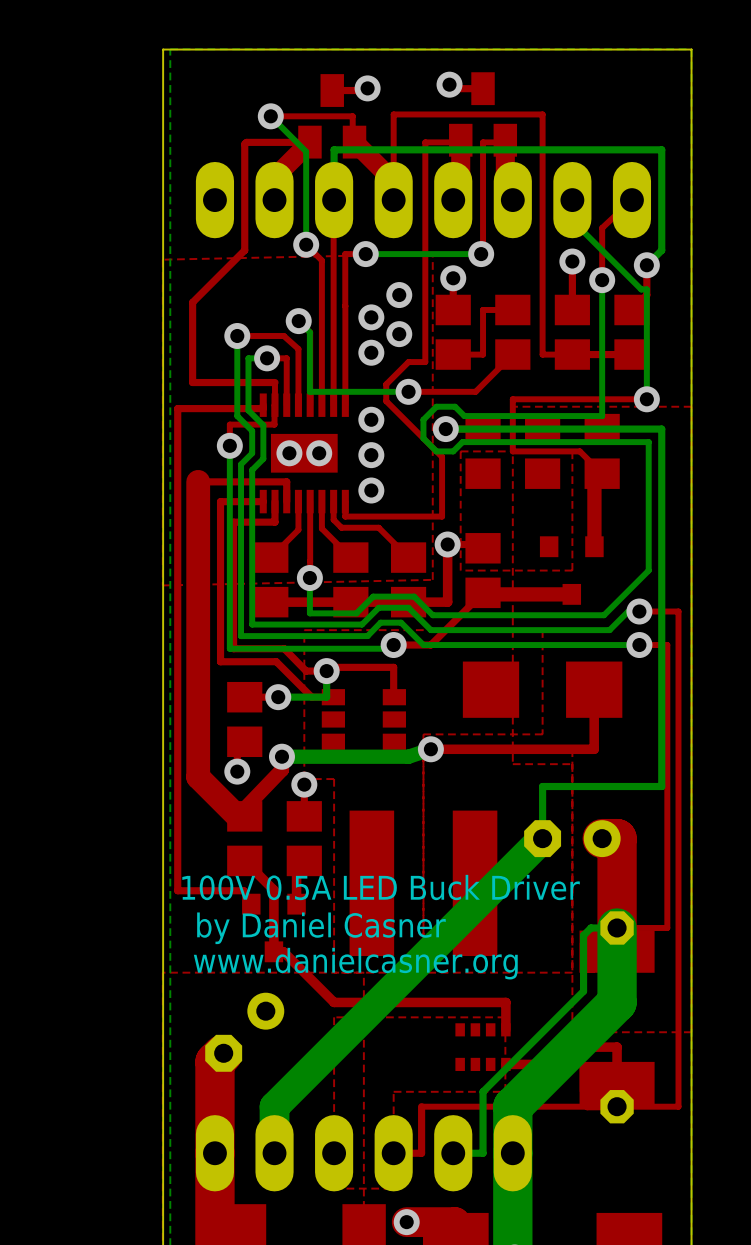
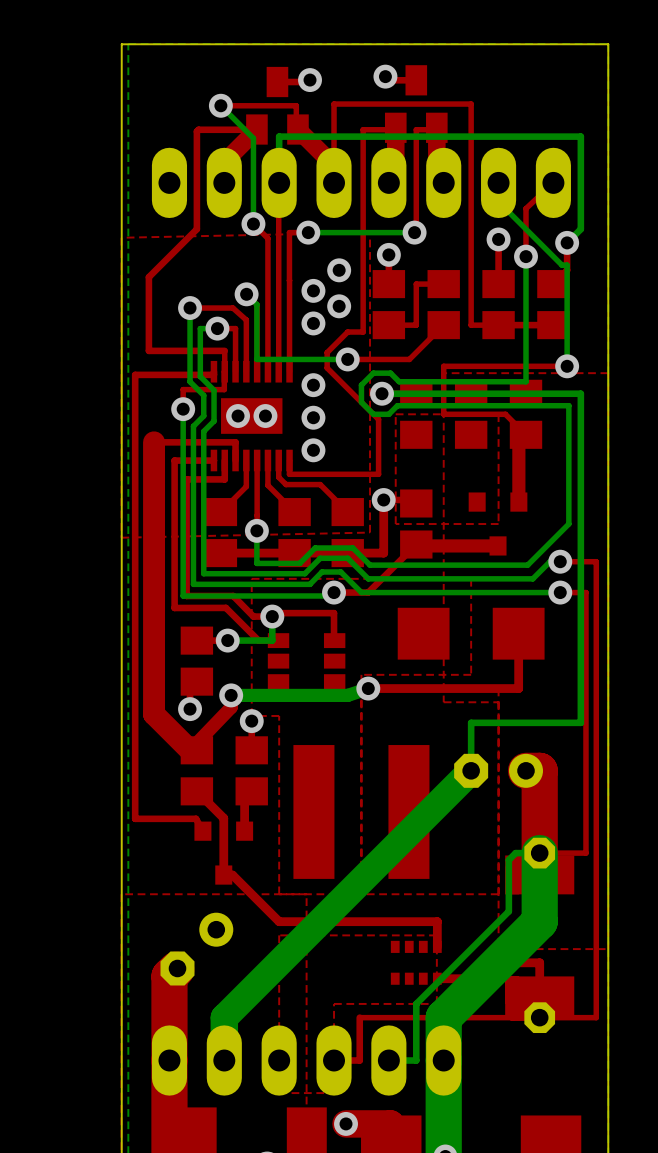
text: 100V 0.5A LED Buck Driver (381, 887) -> none
text: by Daniel Casner (321, 928) -> none
text: www.danielcasner.org (355, 963) -> none

